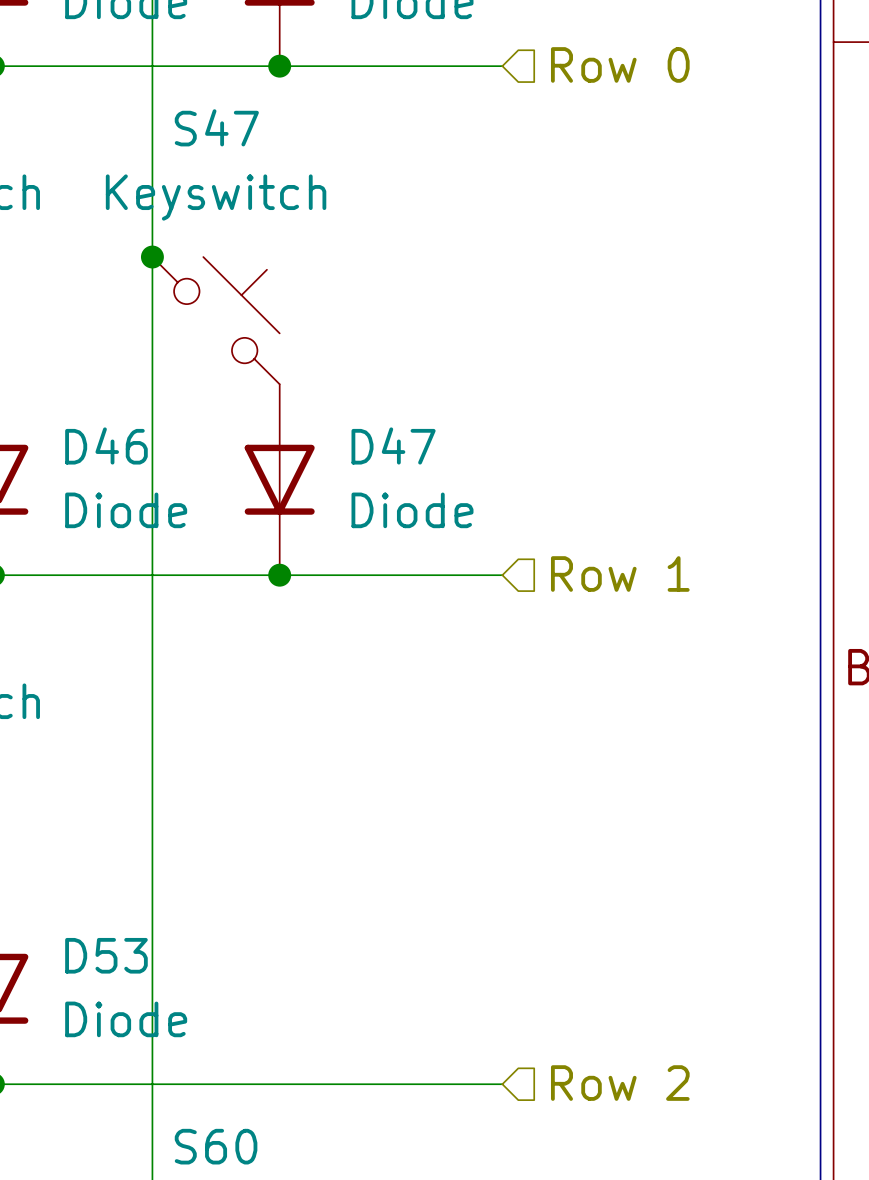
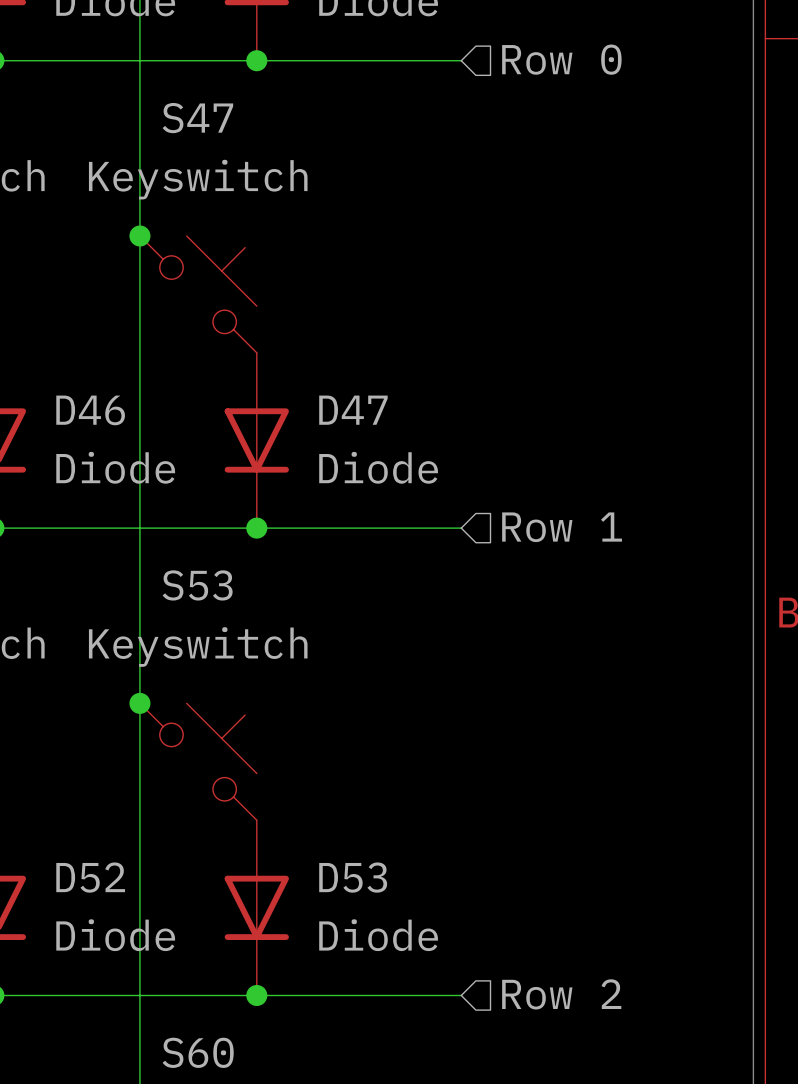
junction: none -> (139, 703)
S53: none -> Keyswitch (198, 761)
D53 name: D53 (106, 955) -> D52 (90, 877)
D53: none -> Diode (256, 907)
junction: none -> (256, 995)

